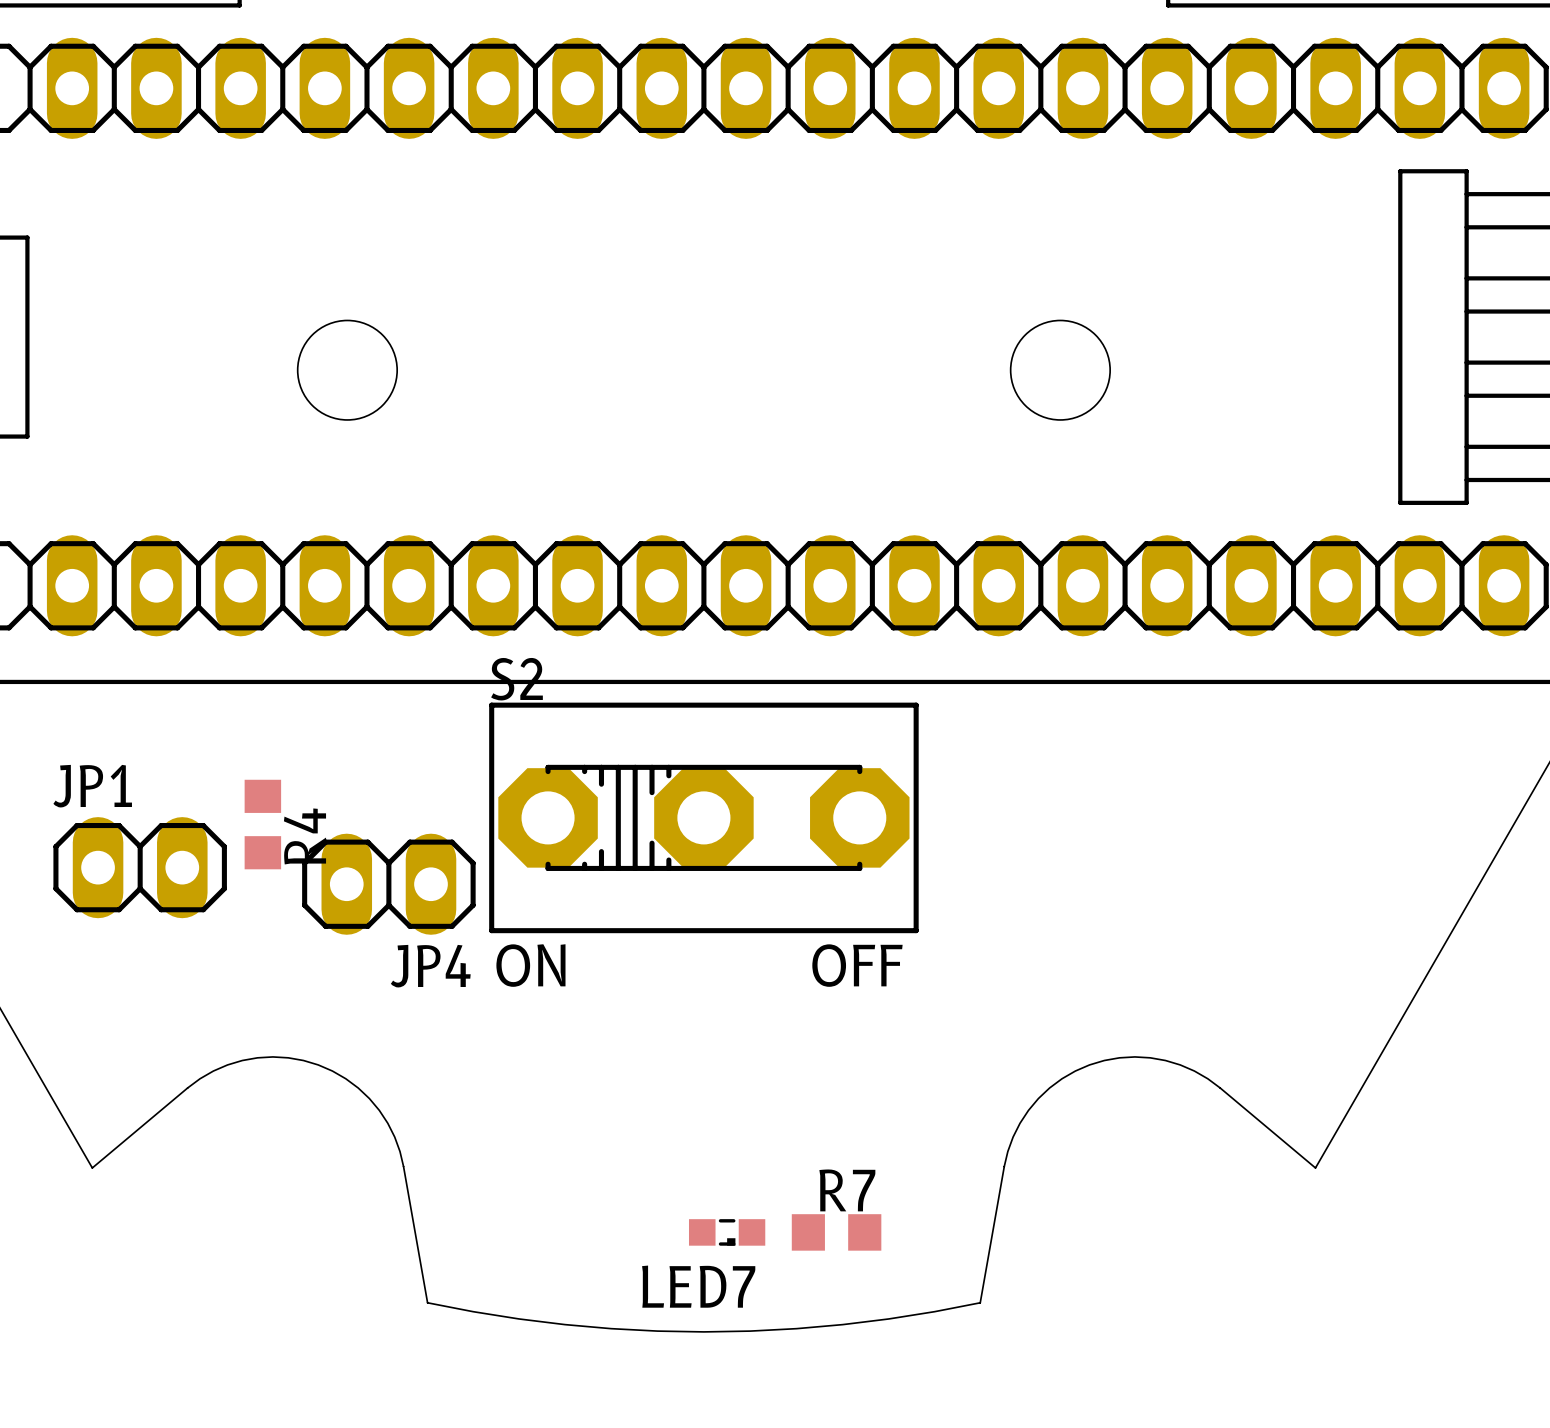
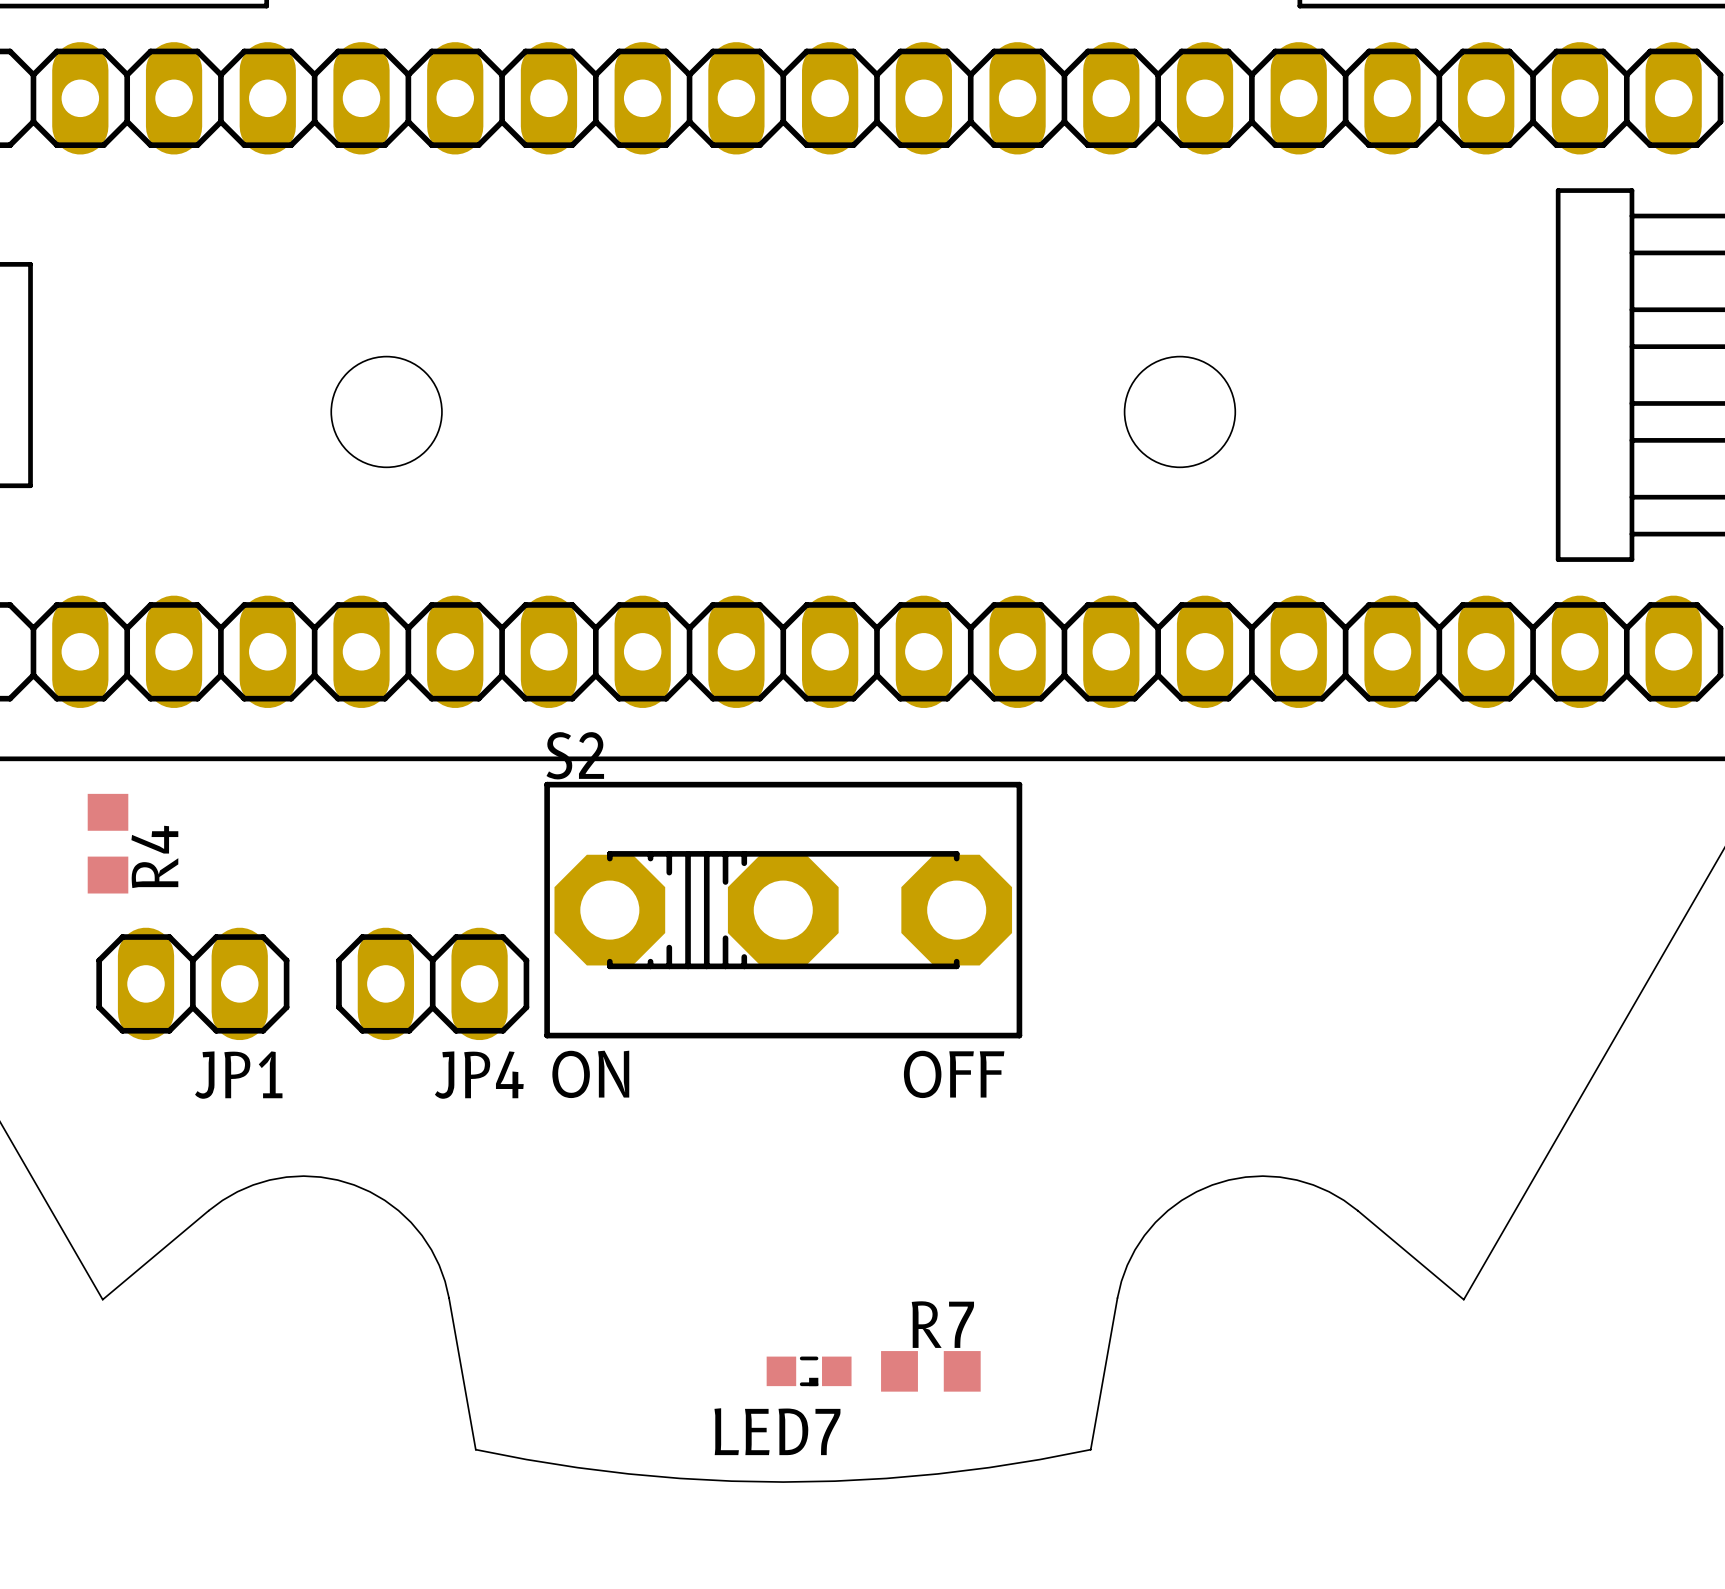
JP1 name position: JP1 (92, 786) -> JP1 (238, 1075)
R4 position: (262, 824) -> (108, 843)
JP1 position: (140, 867) -> (192, 983)

